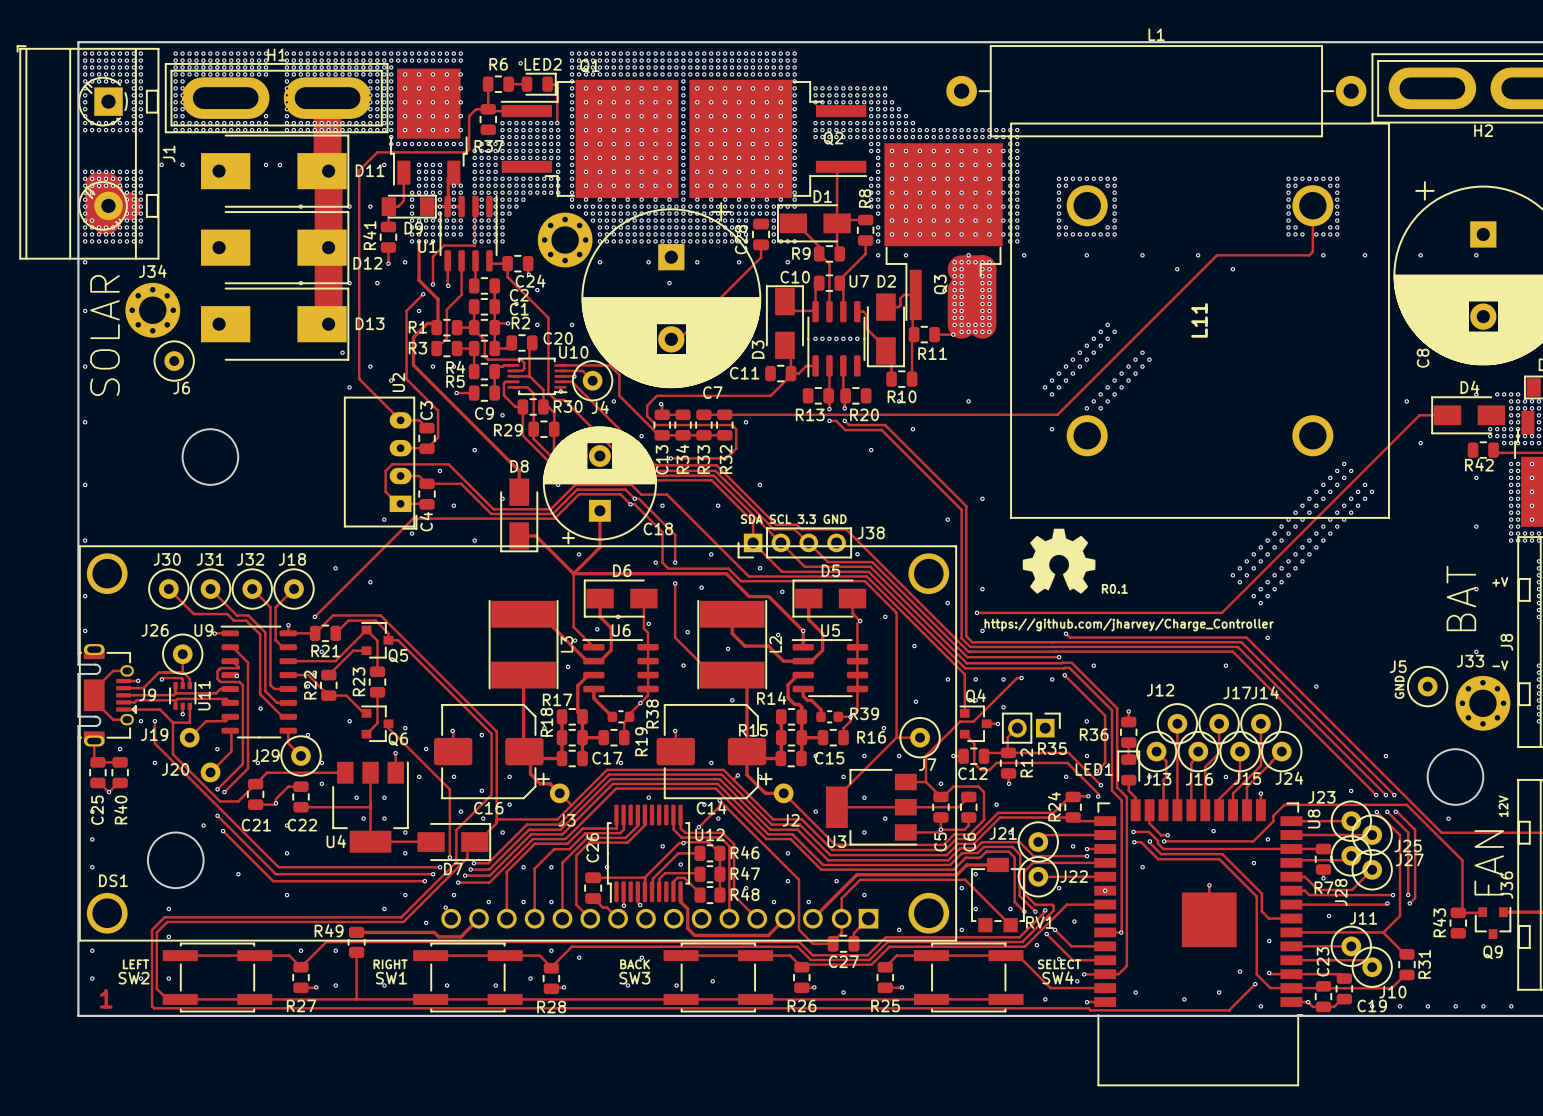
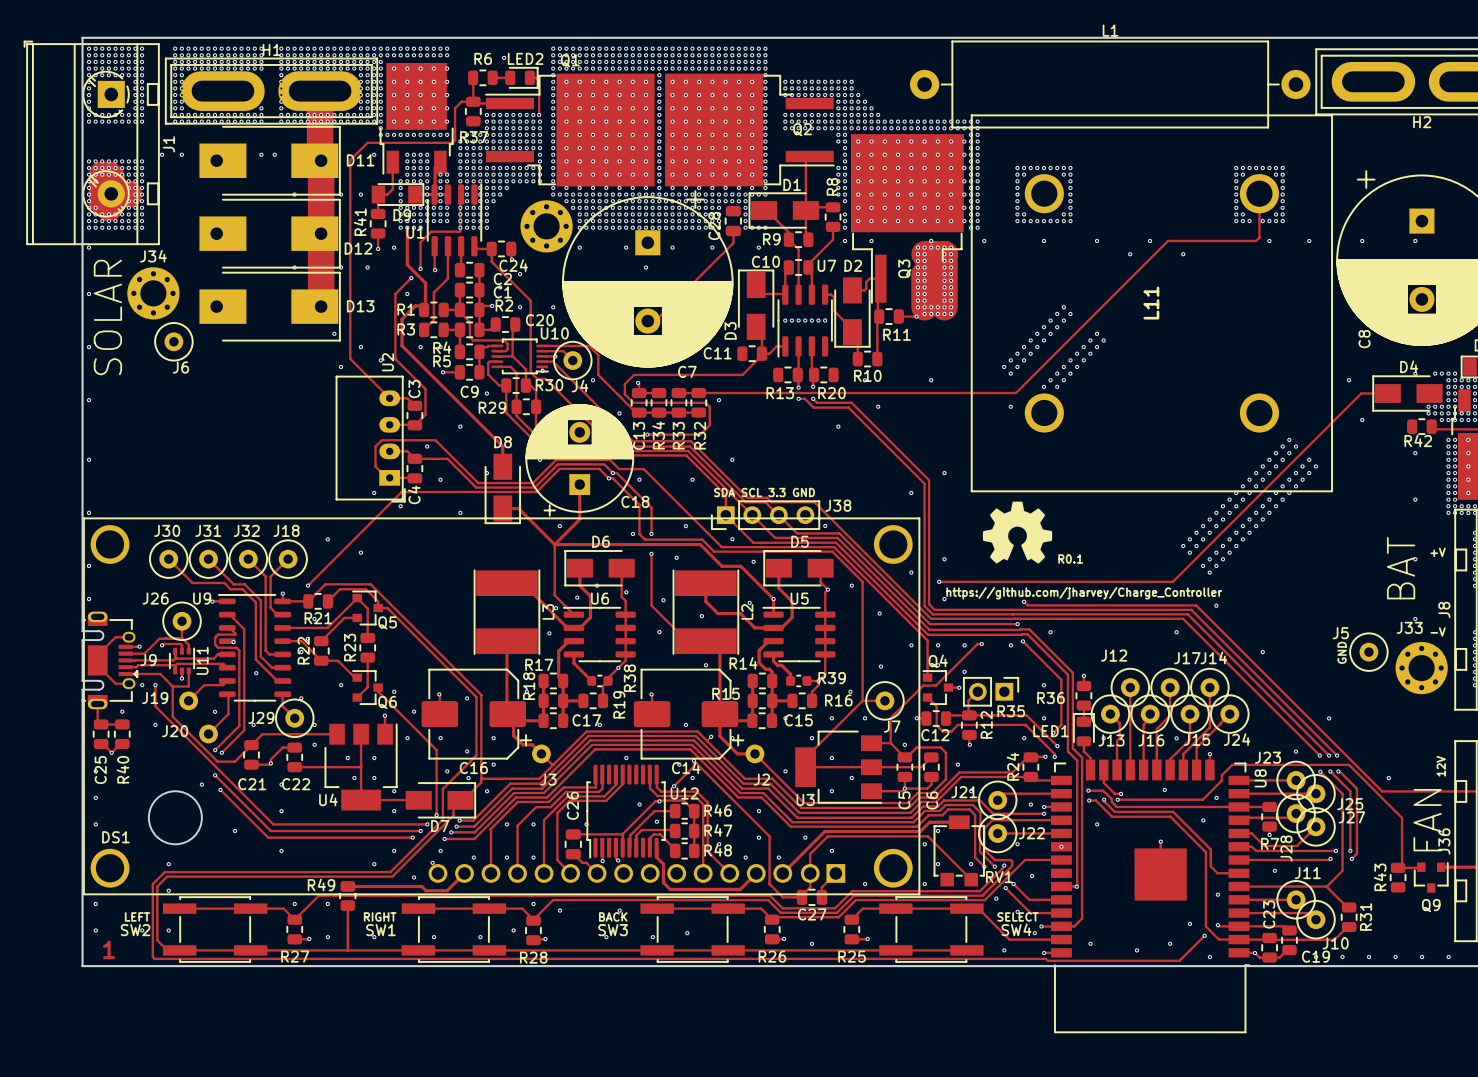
round board edge: [182, 428, 239, 486] -> none
round board edge: [1427, 748, 1484, 806] -> none

